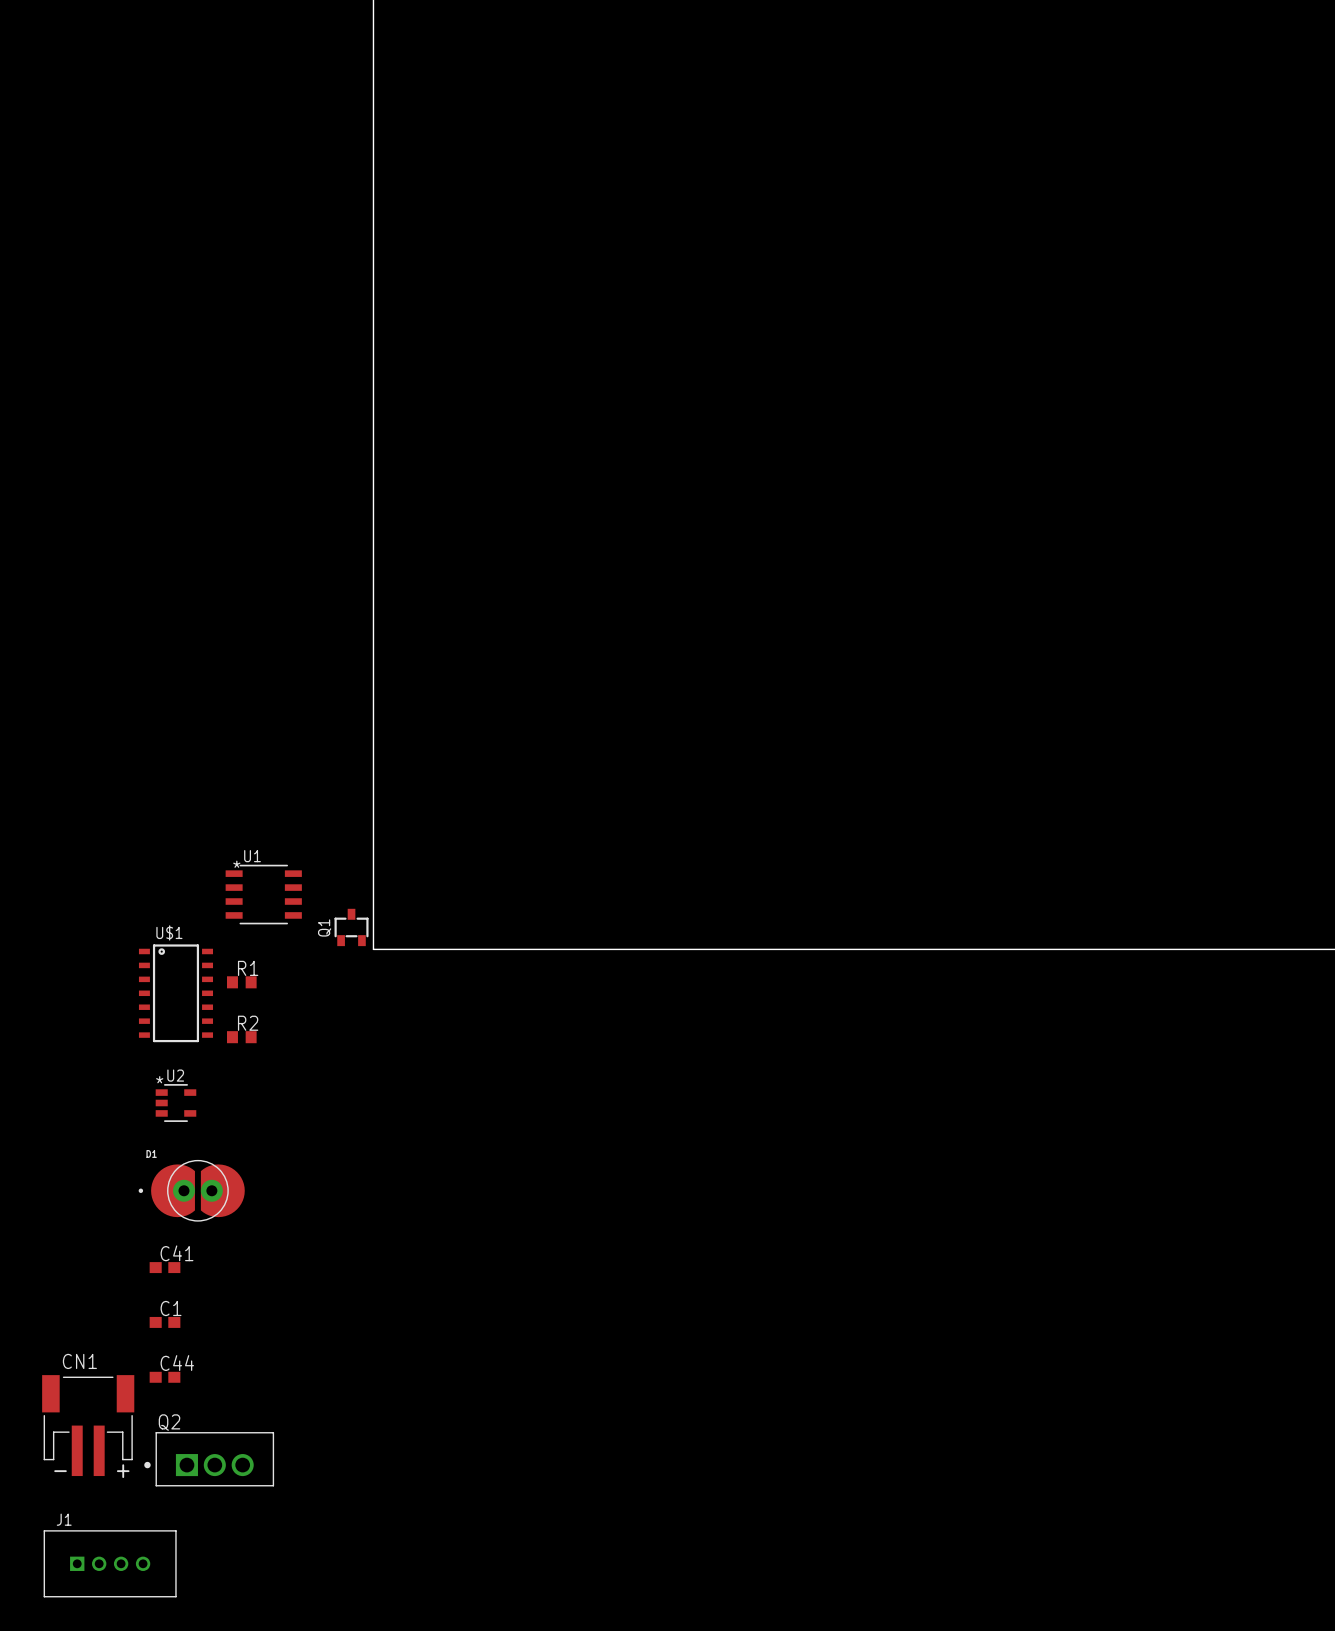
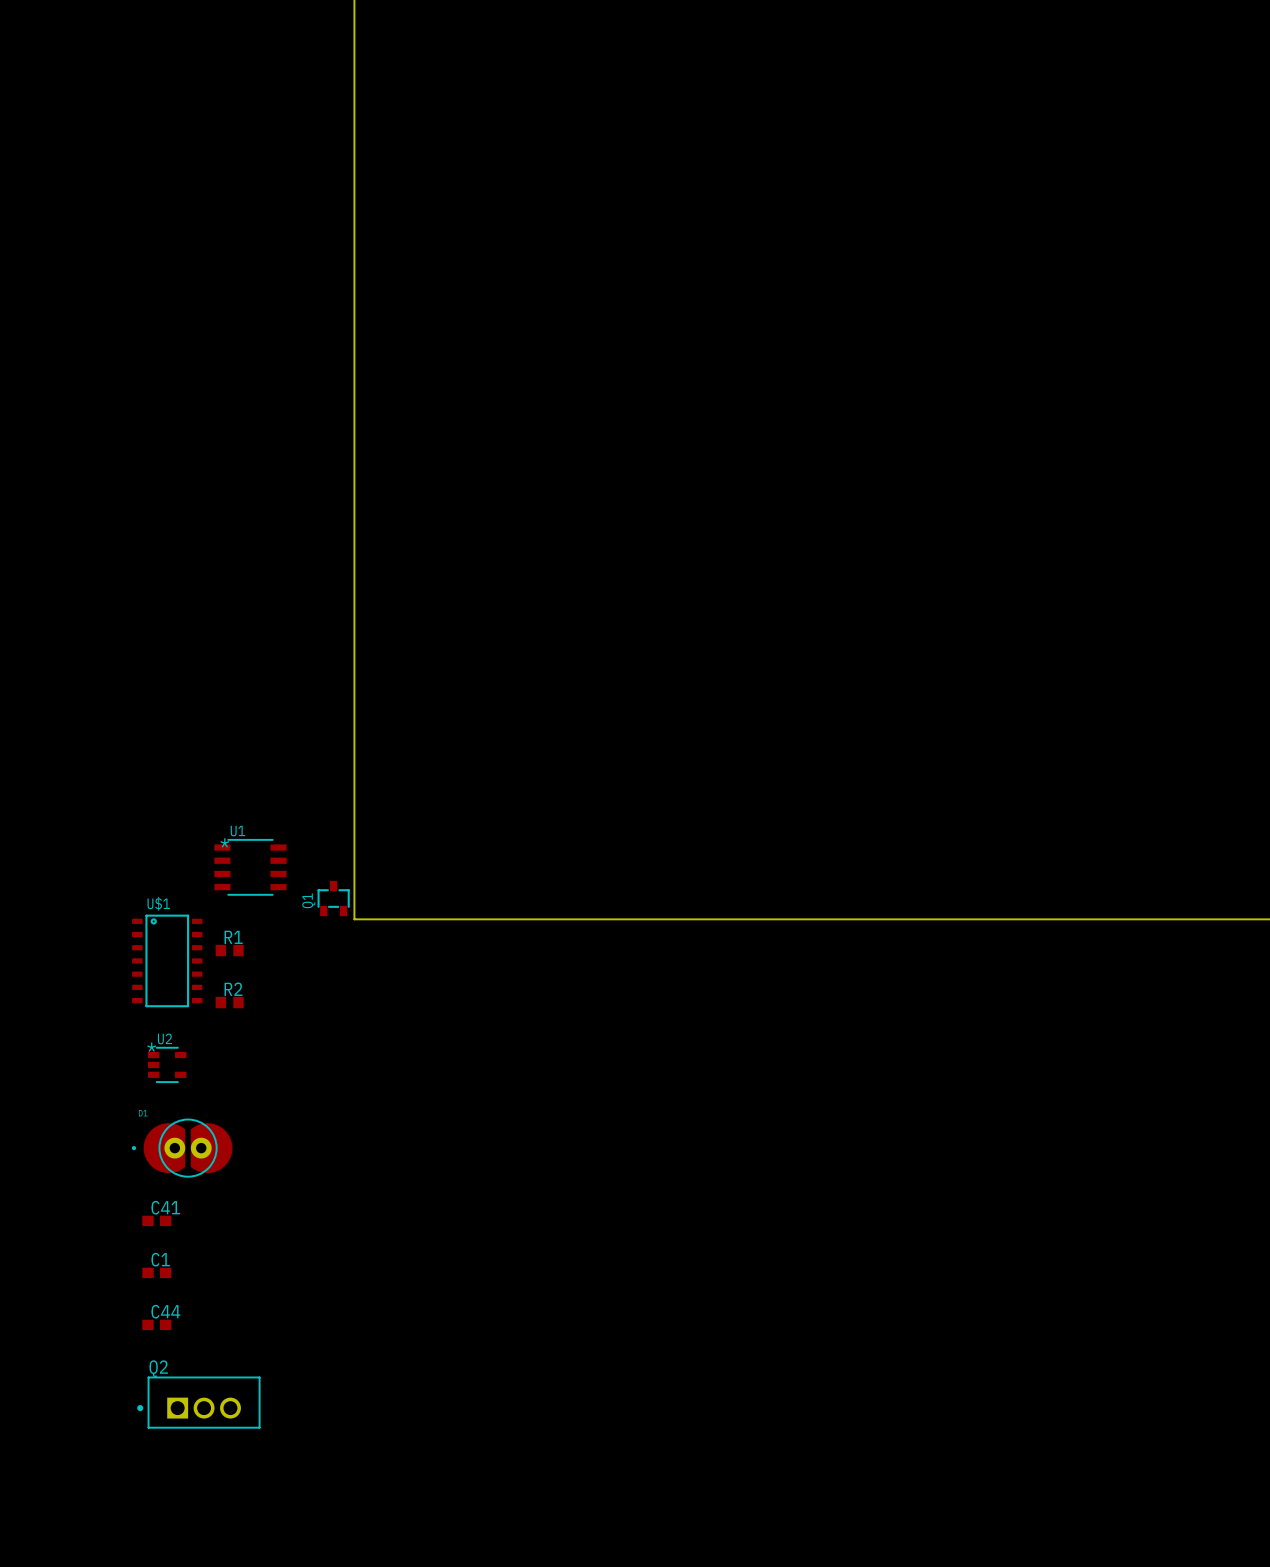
CN1: (88, 1425) -> none
J1: (110, 1563) -> none

